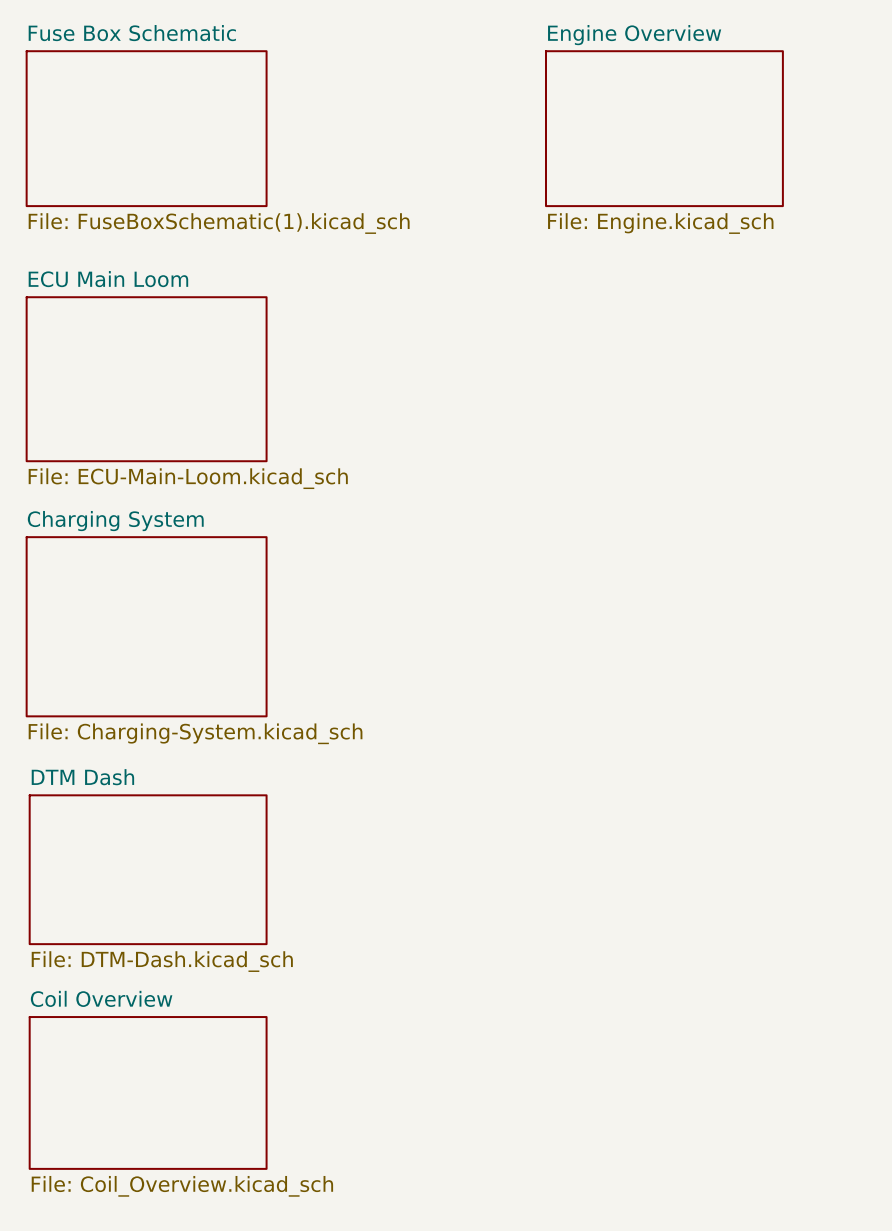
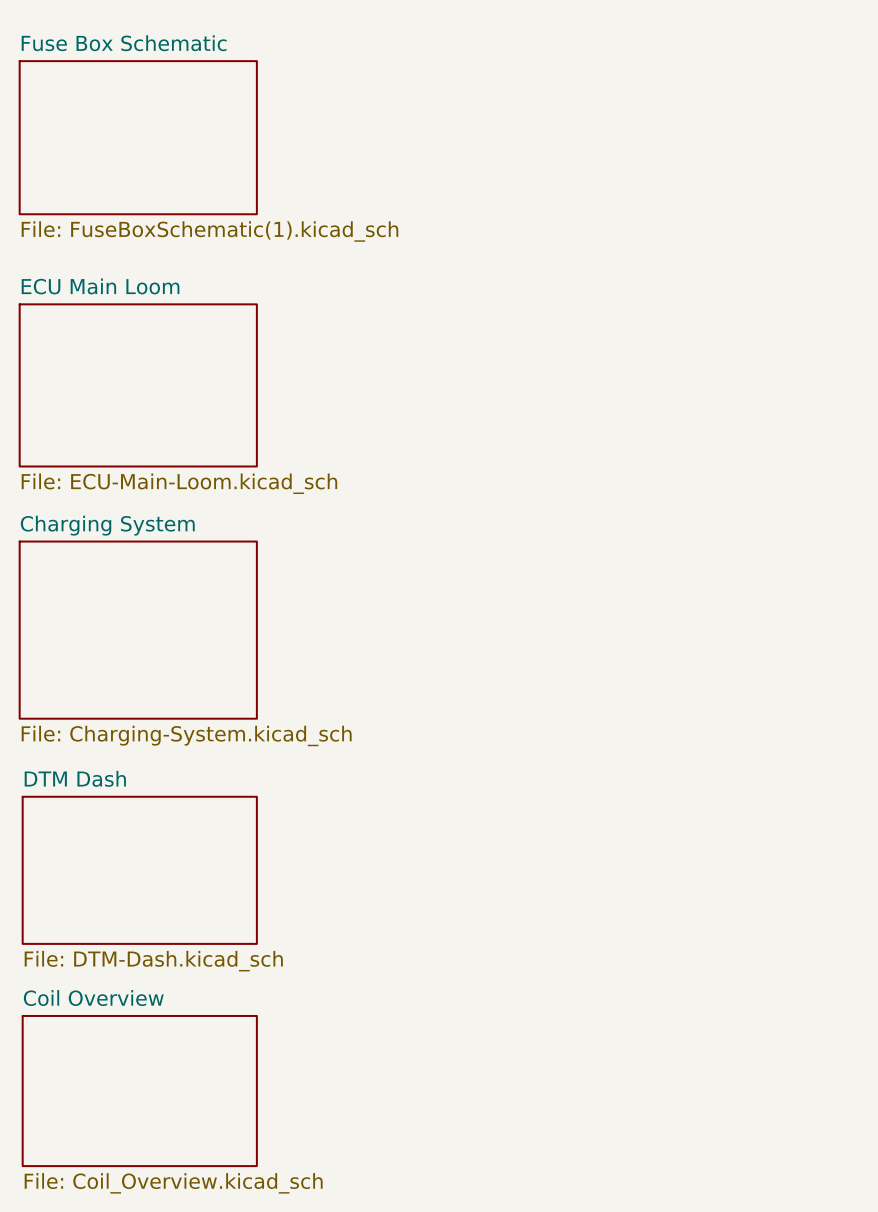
sheet Engine Overview: File: Engine.kicad_sch (664, 128) -> none

